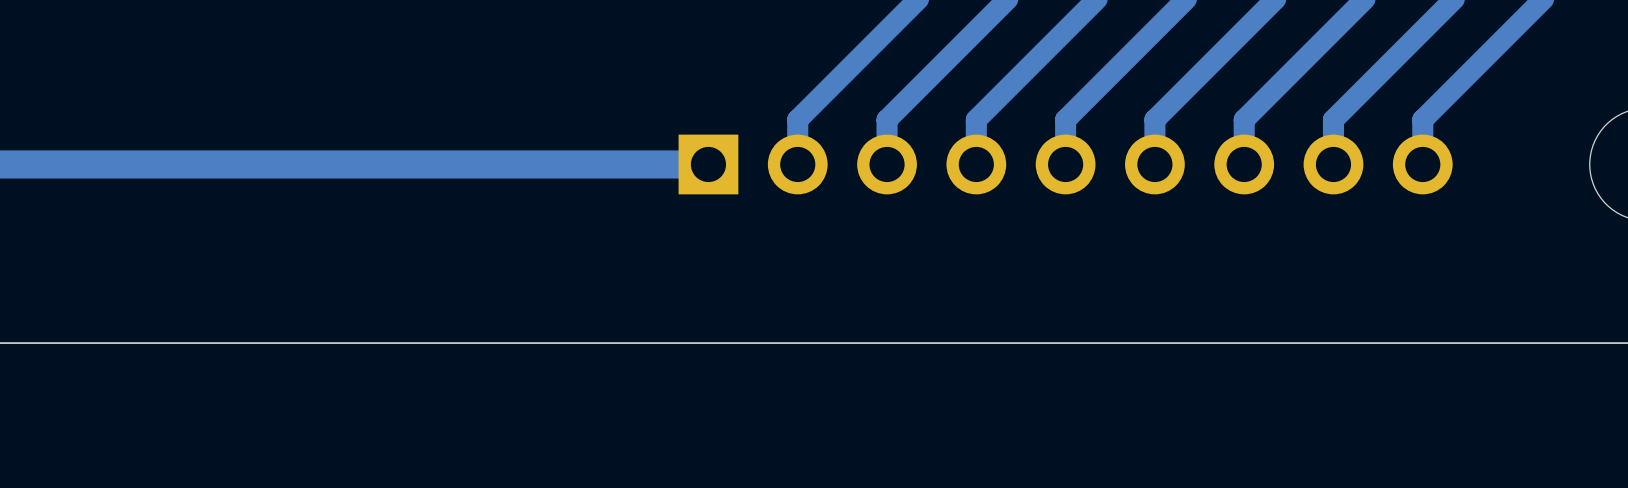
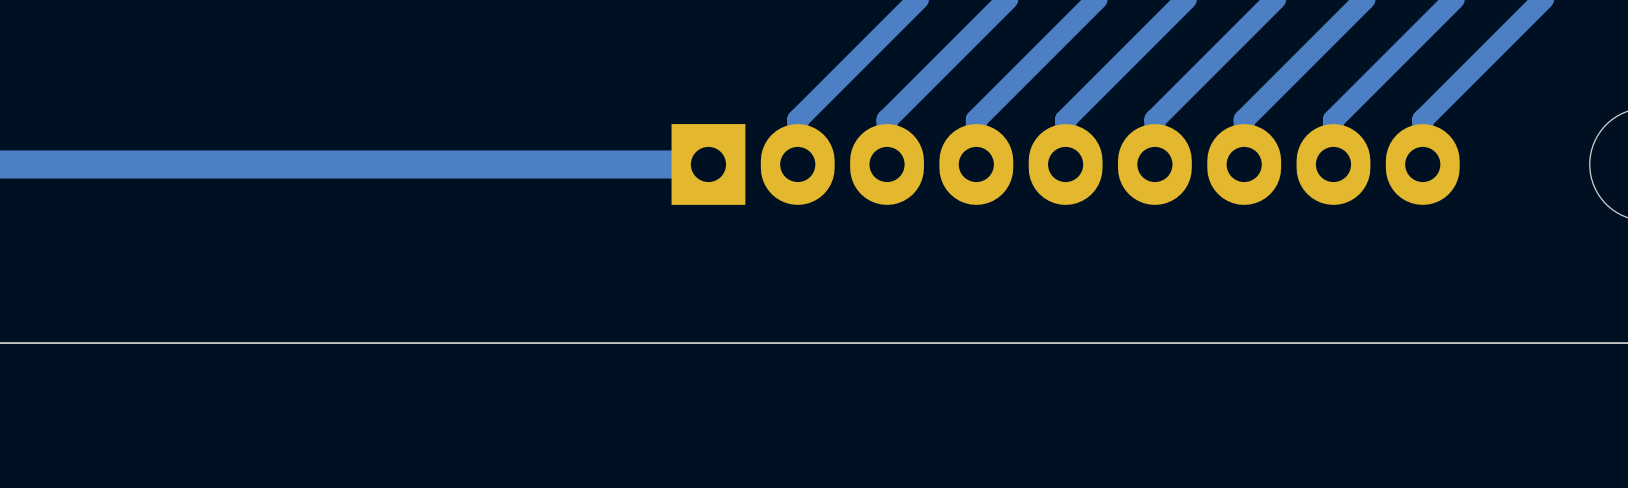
part footprint: [678, 134, 1453, 195] -> [671, 124, 1460, 205]

